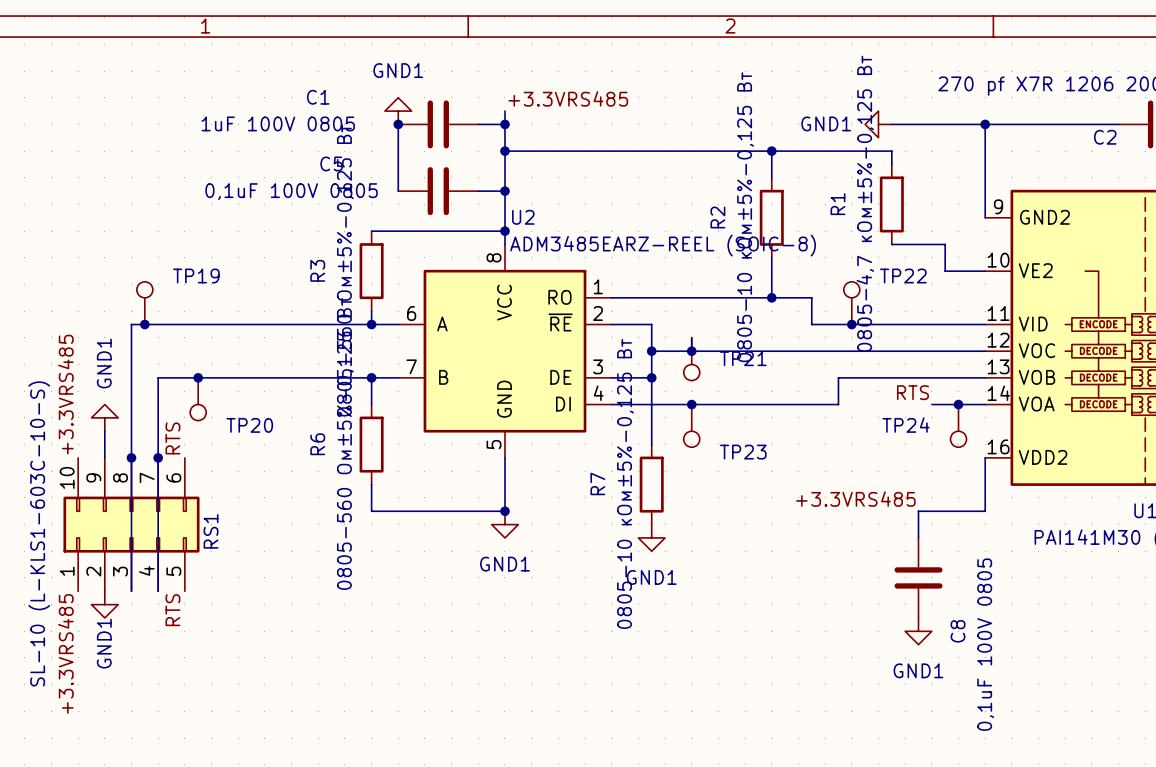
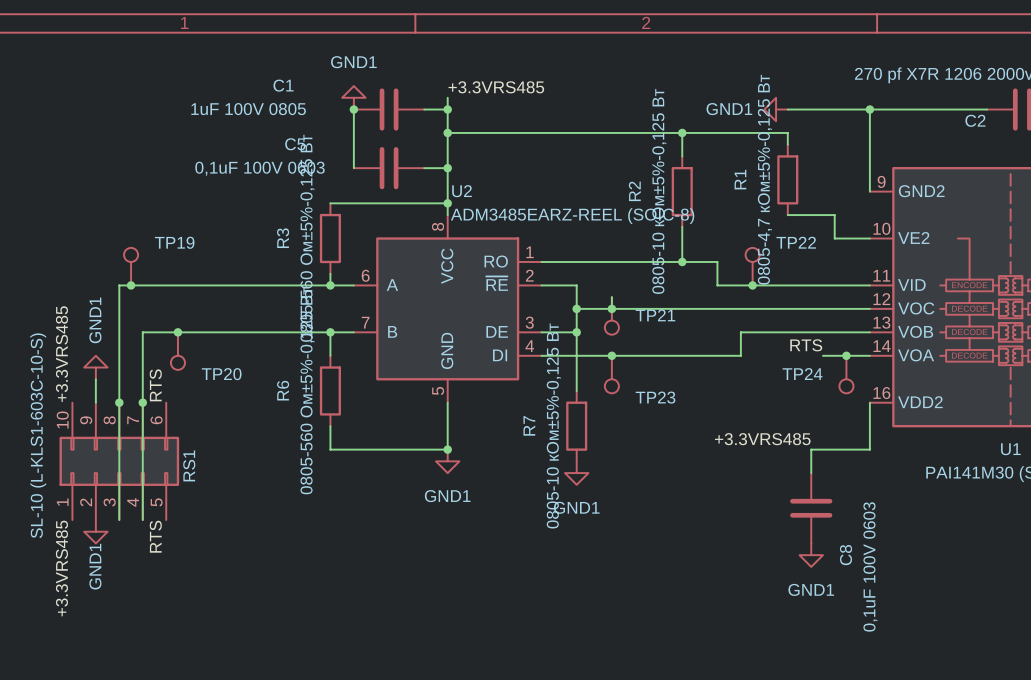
C5 value: 0,1uF 100V 0805 (291, 191) -> 0,1uF 100V 0603 (260, 168)
C8 value: 0,1uF 100V 0805 (985, 644) -> 0,1uF 100V 0603 (870, 566)

